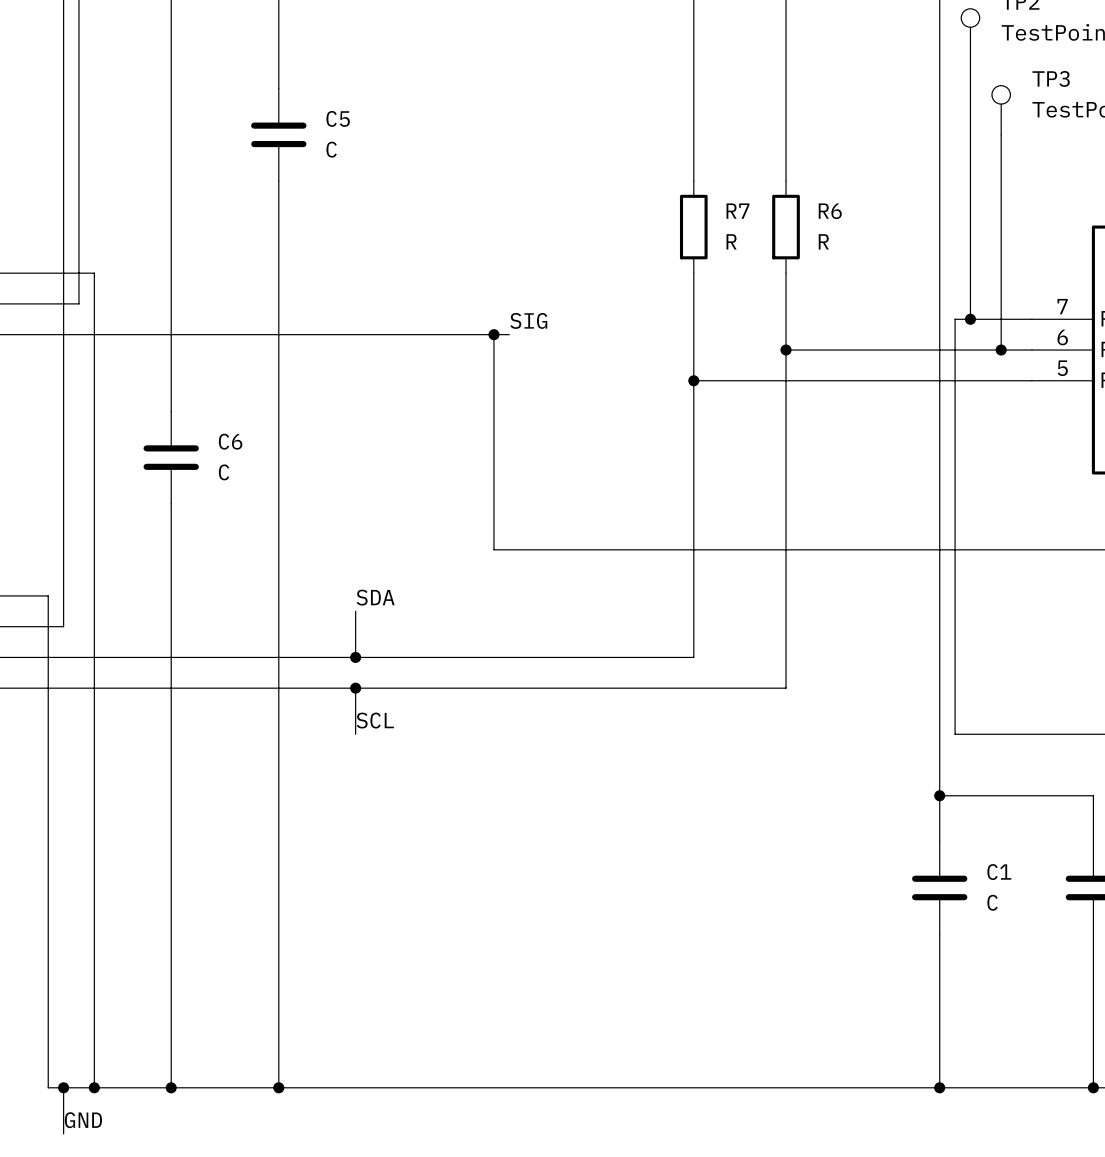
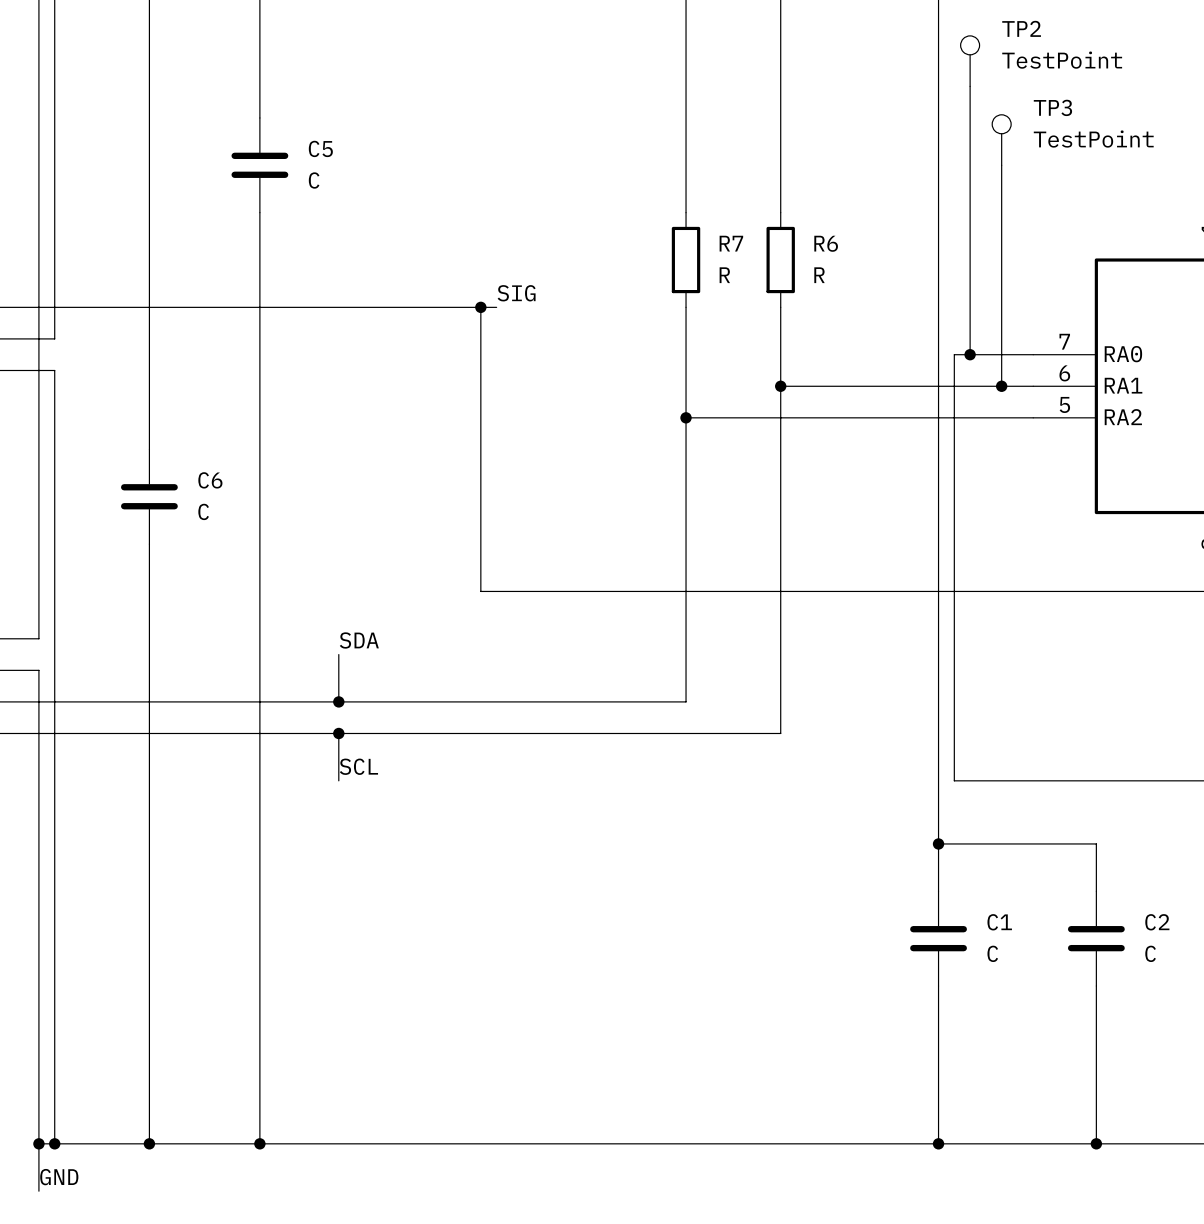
wire: (94, 273) (94, 1087) -> (70, 307) (496, 307)
wire: none -> (480, 307) (480, 370)
label position: SIG (528, 320) -> SIG (516, 293)
wire: (78, 334) (509, 334) -> (54, 370) (54, 1143)
junction position: (493, 334) -> (480, 307)
wire: (48, 595) (48, 1087) (63, 1087) -> (38, 670) (38, 1143)
wire: (63, 595) (63, 626) -> (38, 638) (23, 638)
junction position: (94, 1087) -> (54, 1143)

